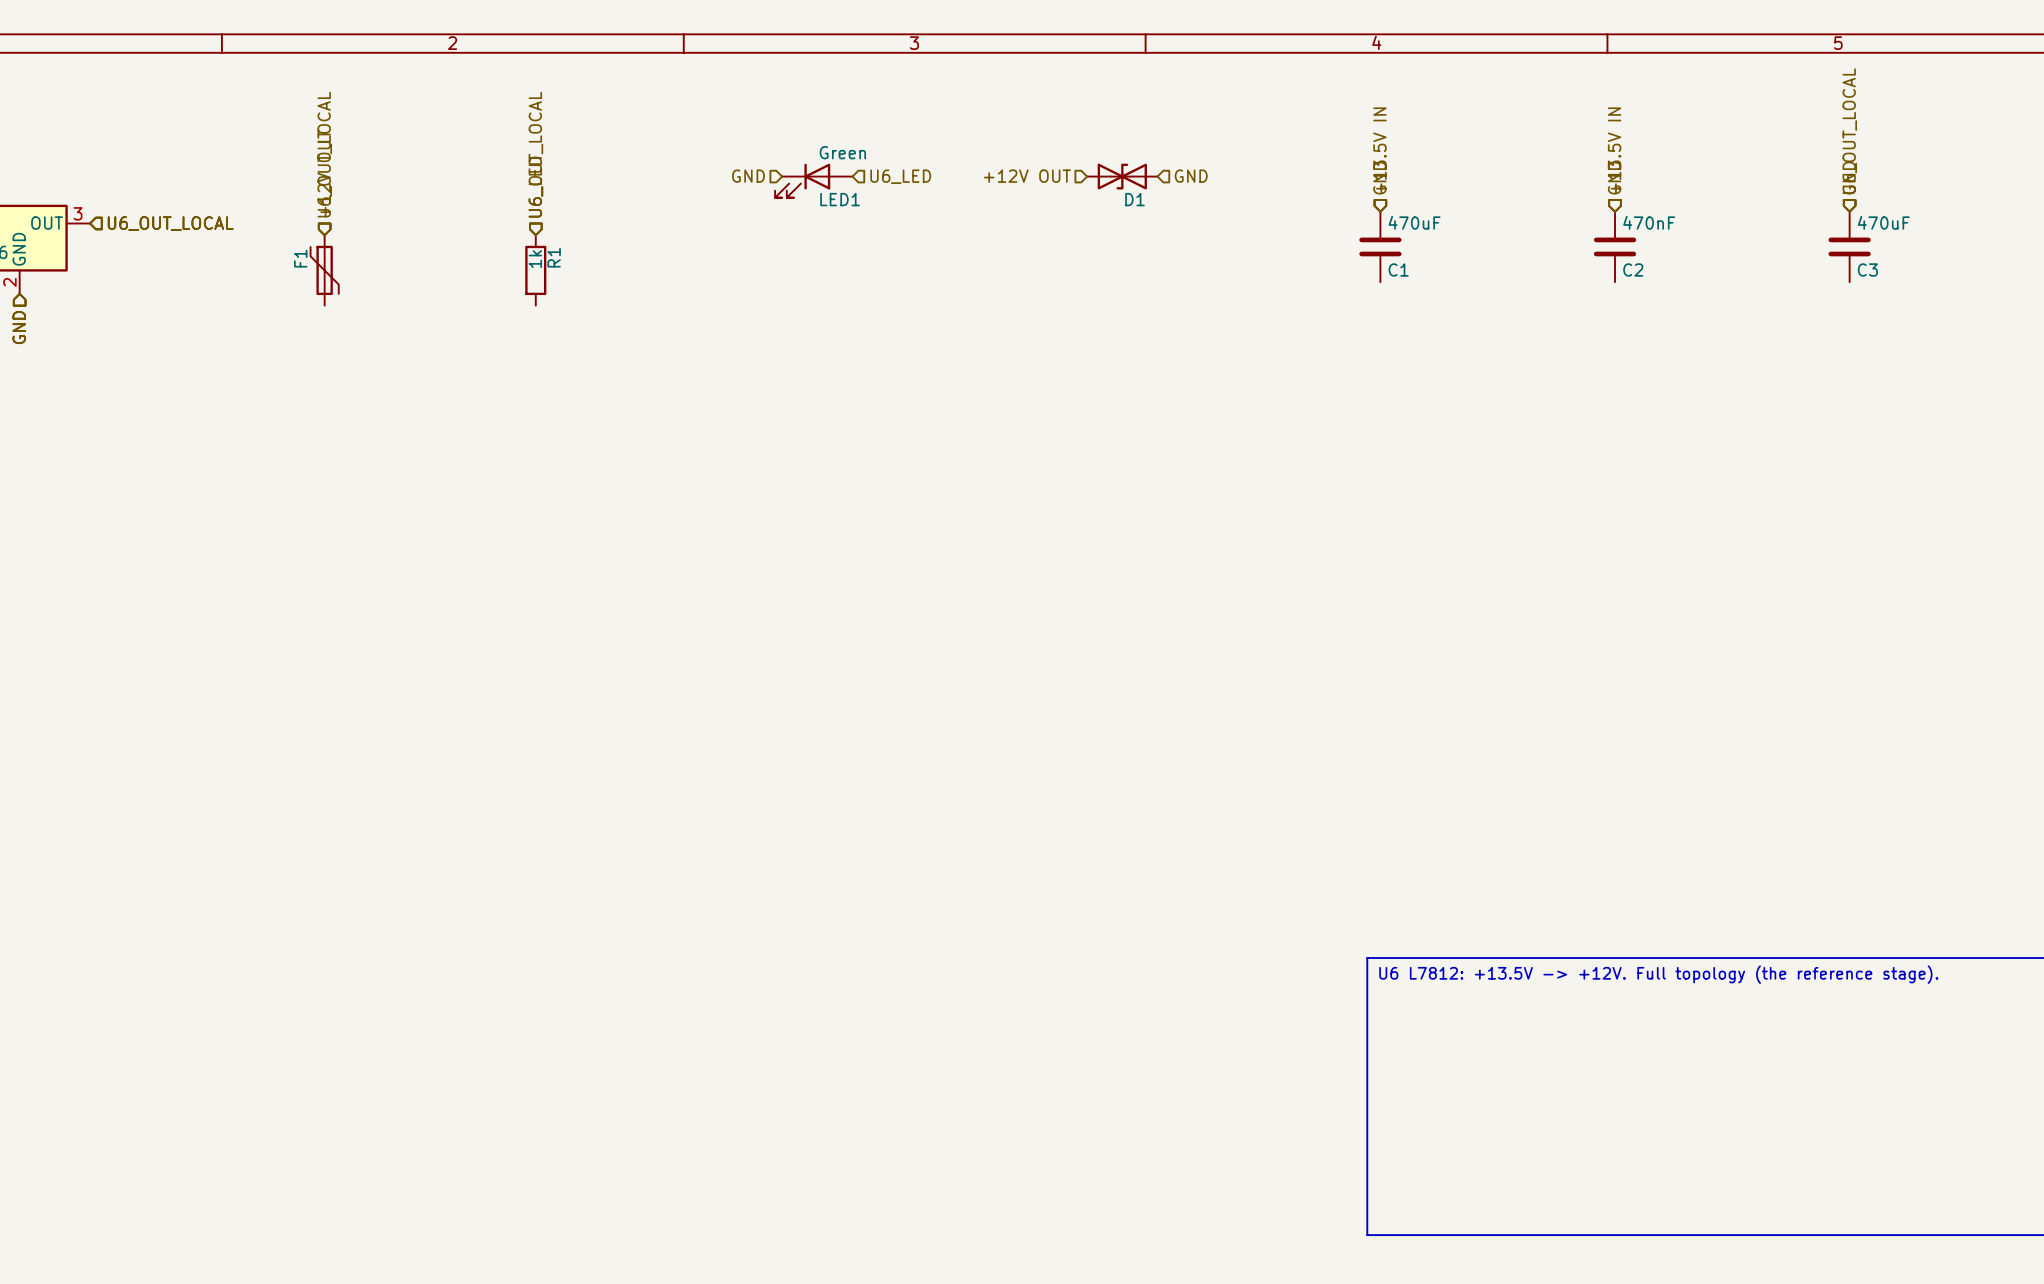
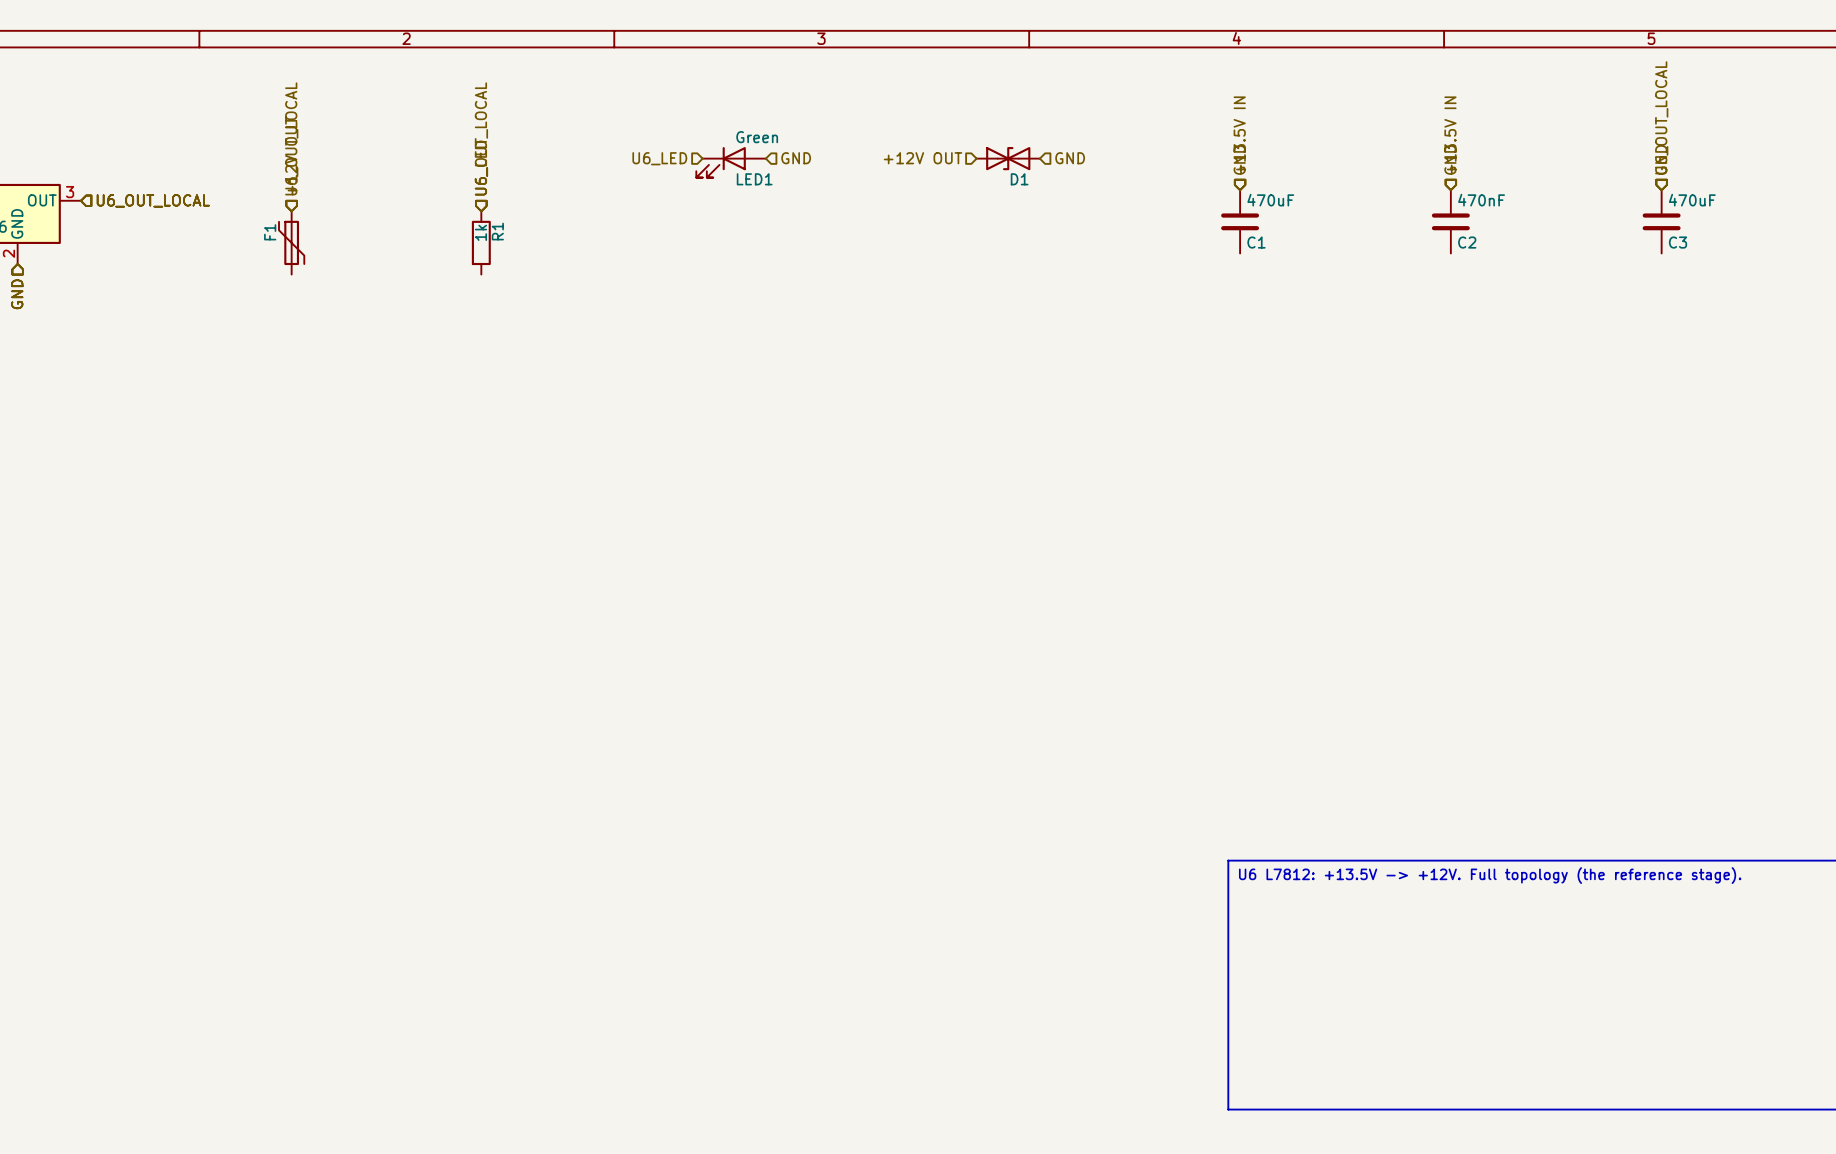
hierarchical label: GND (748, 176) -> U6_LED (659, 158)
hierarchical label: U6_LED (900, 176) -> GND (796, 158)

